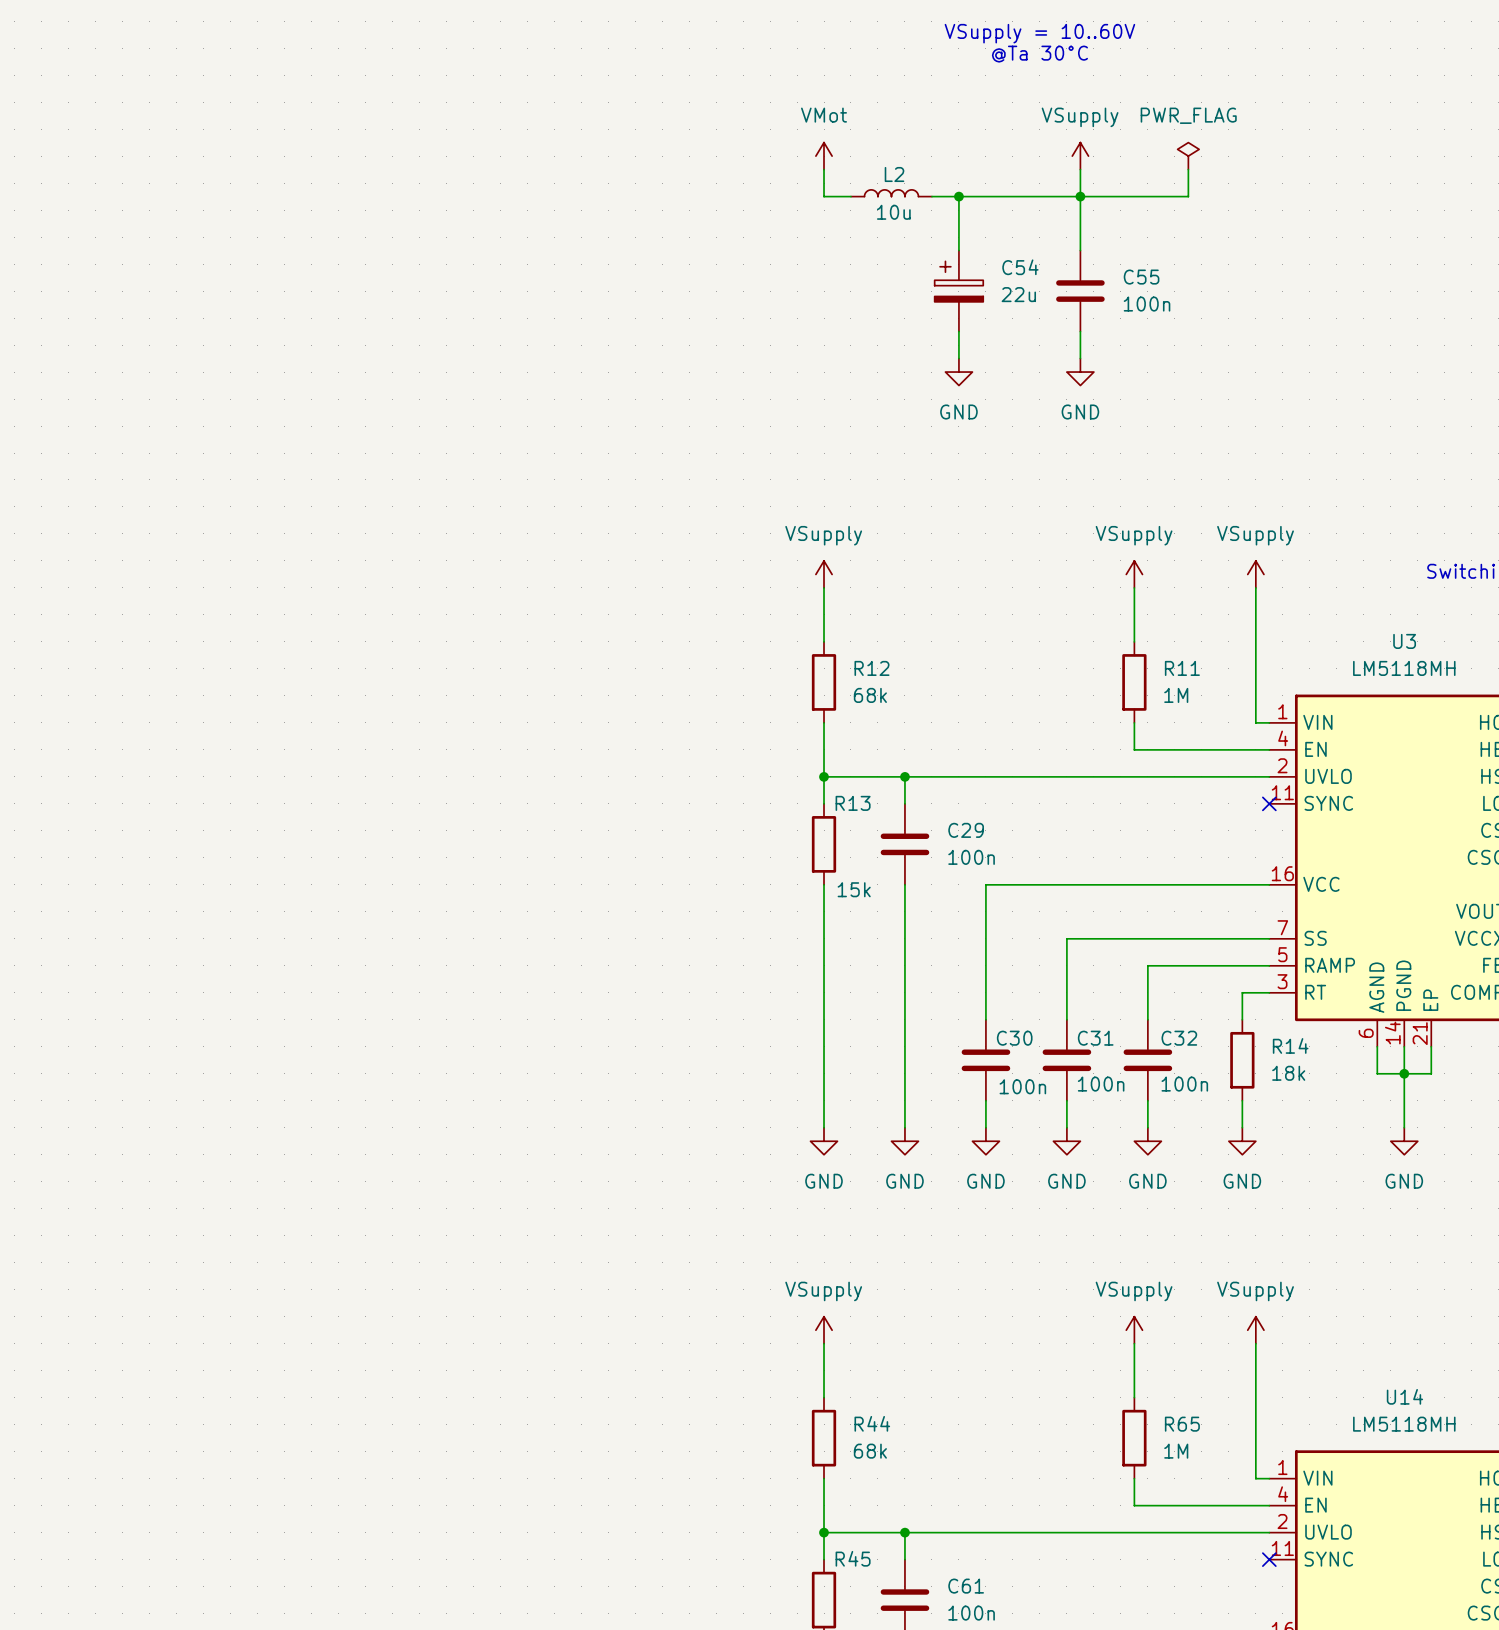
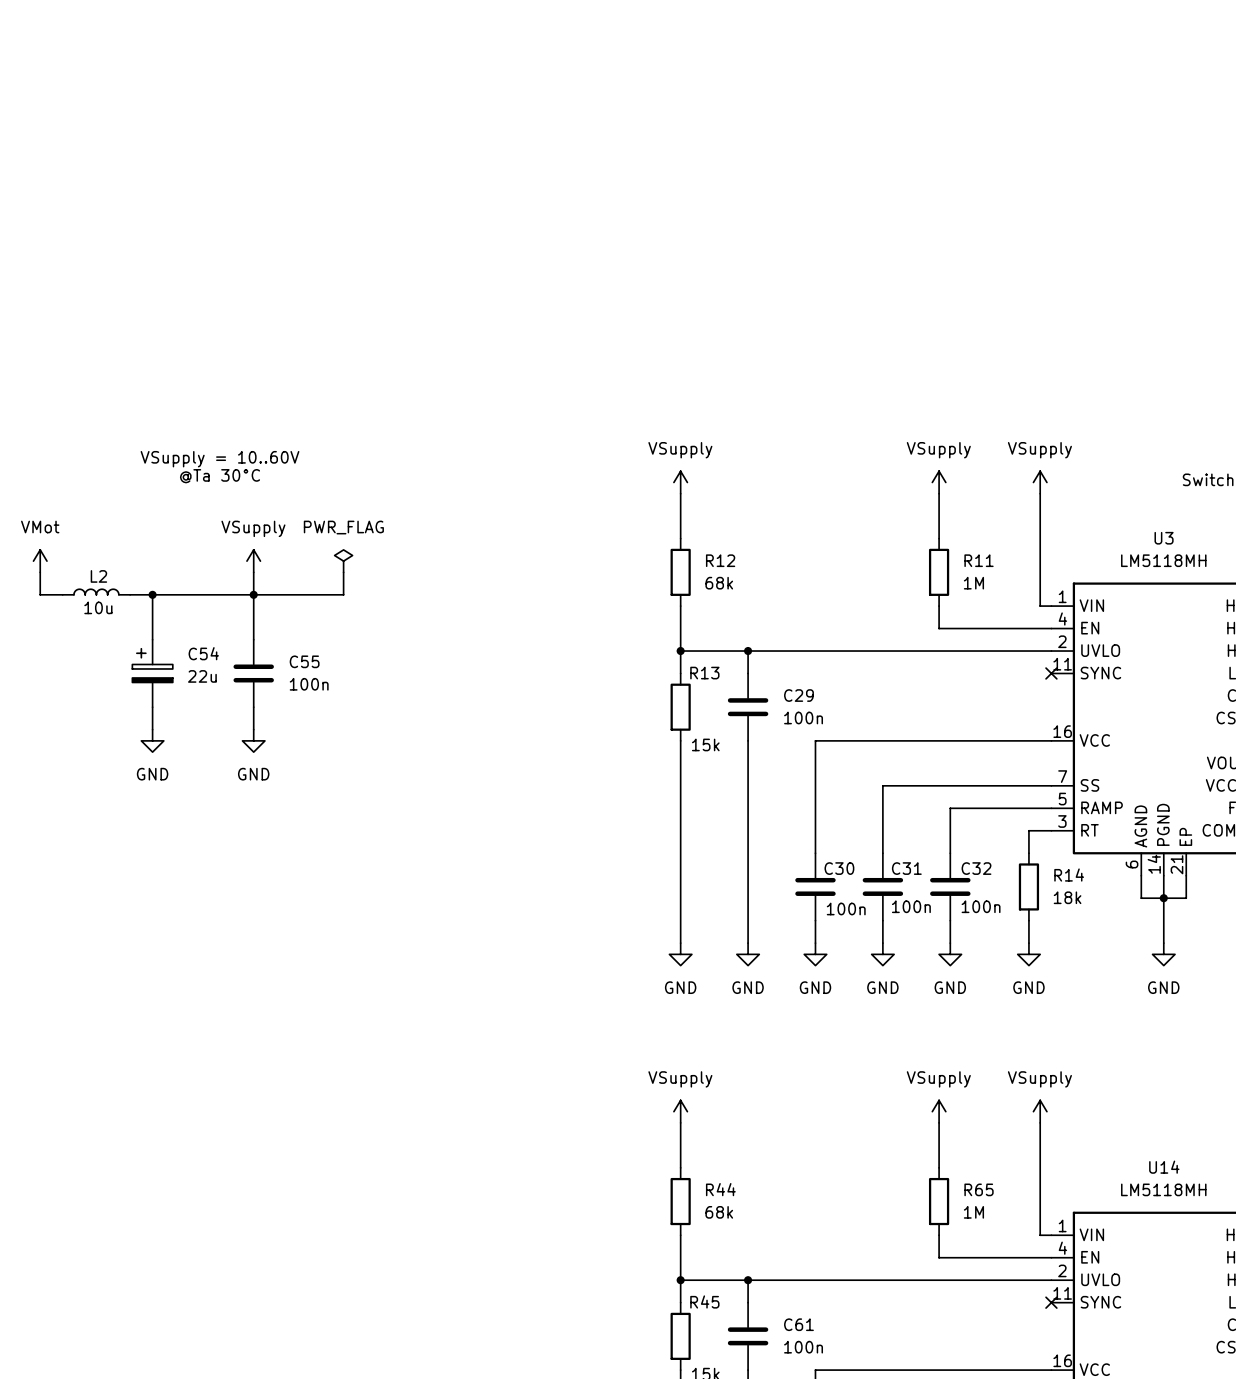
text: VSupply = 10..60V (1039, 33) -> none
text: @Ta 30°C (1039, 54) -> none
power symbol: VMot (824, 156) -> none
power symbol: VSupply (1080, 156) -> none
power symbol: PWR_FLAG (1188, 156) -> none
wire: (824, 169) (824, 196) (850, 196) -> none
wire: (1080, 169) (1080, 250) -> none
wire: (1188, 169) (1188, 196) (931, 196) -> none
L2 position: (891, 193) -> (96, 592)
wire: (958, 196) (958, 250) -> none
junction: (958, 196) -> none
junction: (1080, 196) -> none
C54 position: (958, 291) -> (152, 673)
C55 position: (1080, 291) -> (253, 673)
wire: (958, 331) (958, 358) -> none
wire: (1080, 331) (1080, 358) -> none
power symbol: GND (958, 372) -> none
power symbol: GND (1080, 372) -> none
text: none -> VSupply = 10..60V (220, 459)
text: none -> @Ta 30°C (220, 476)
power symbol: none -> VMot (40, 561)
power symbol: none -> VSupply (253, 561)
power symbol: none -> PWR_FLAG (343, 561)
wire: none -> (40, 572) (40, 594) (62, 594)
wire: none -> (253, 572) (253, 639)
wire: none -> (343, 572) (343, 594) (130, 594)
wire: none -> (152, 594) (152, 639)
junction: none -> (152, 594)
junction: none -> (253, 594)
wire: none -> (152, 707) (152, 729)
wire: none -> (253, 707) (253, 729)
power symbol: none -> GND (152, 740)
power symbol: none -> GND (253, 740)

